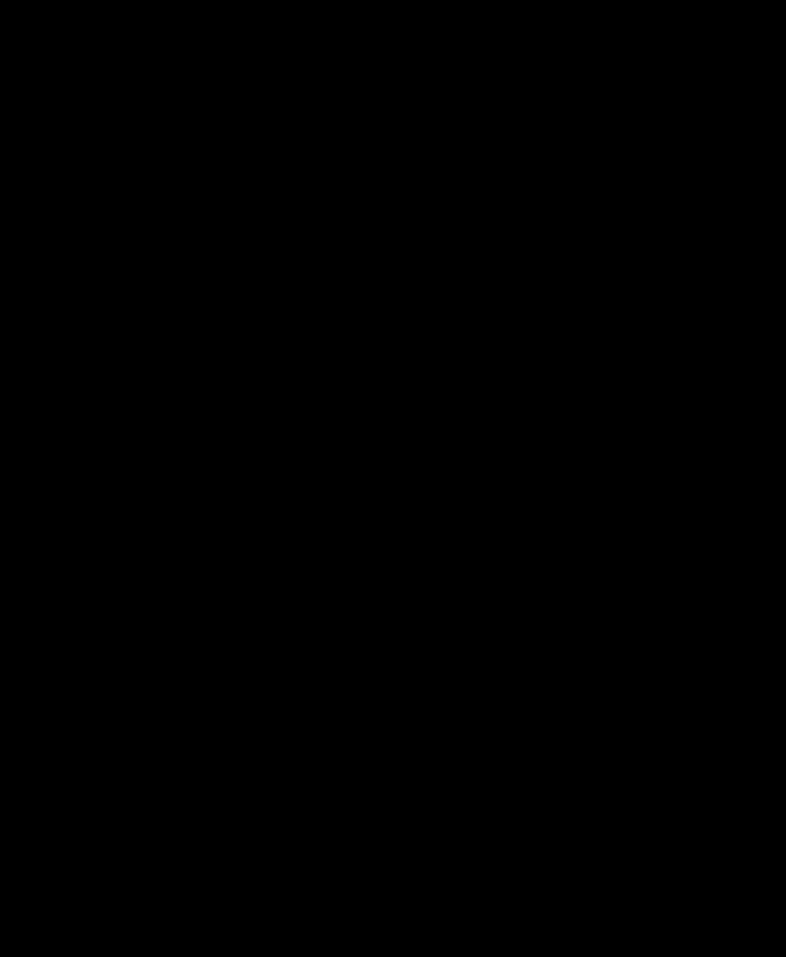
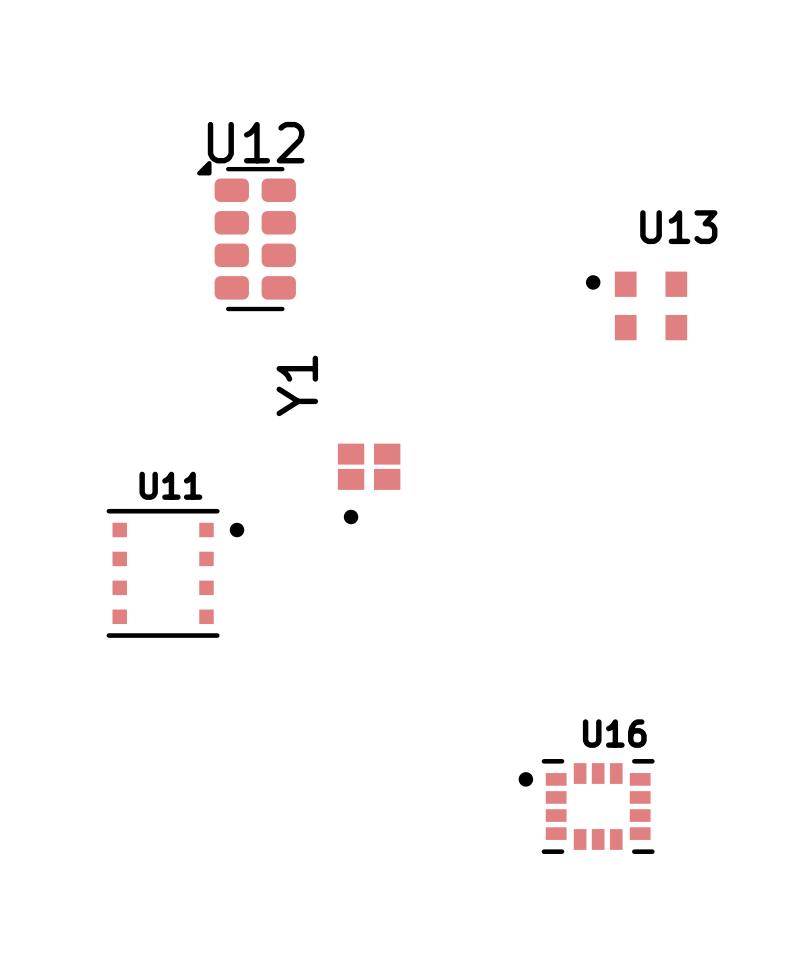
U12: none -> (246, 236)
U13: none -> (636, 305)
Y1: none -> (369, 483)
U11: none -> (175, 573)
U16: none -> (586, 806)

